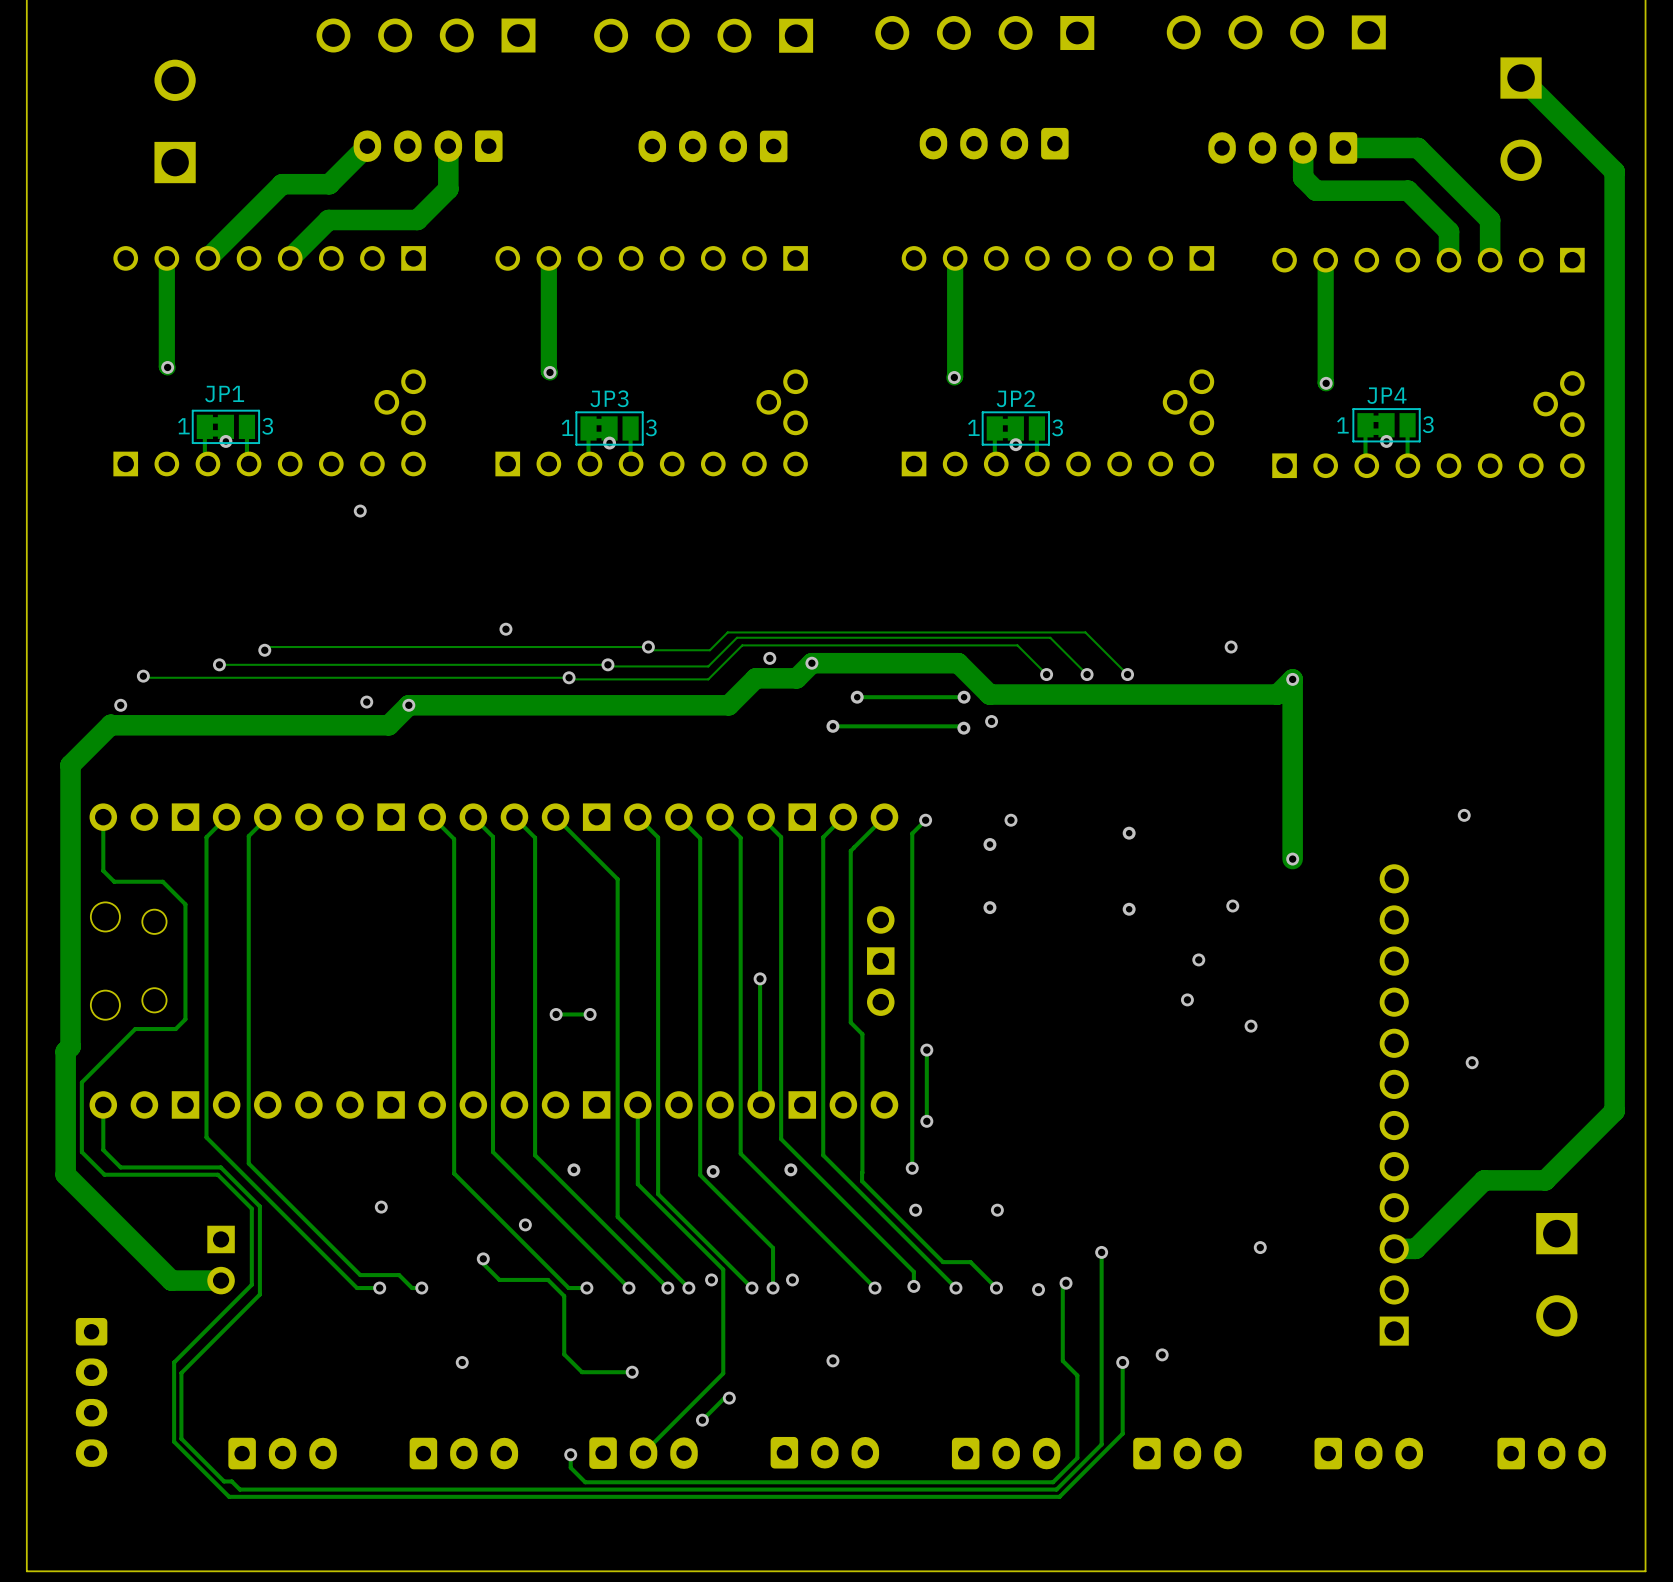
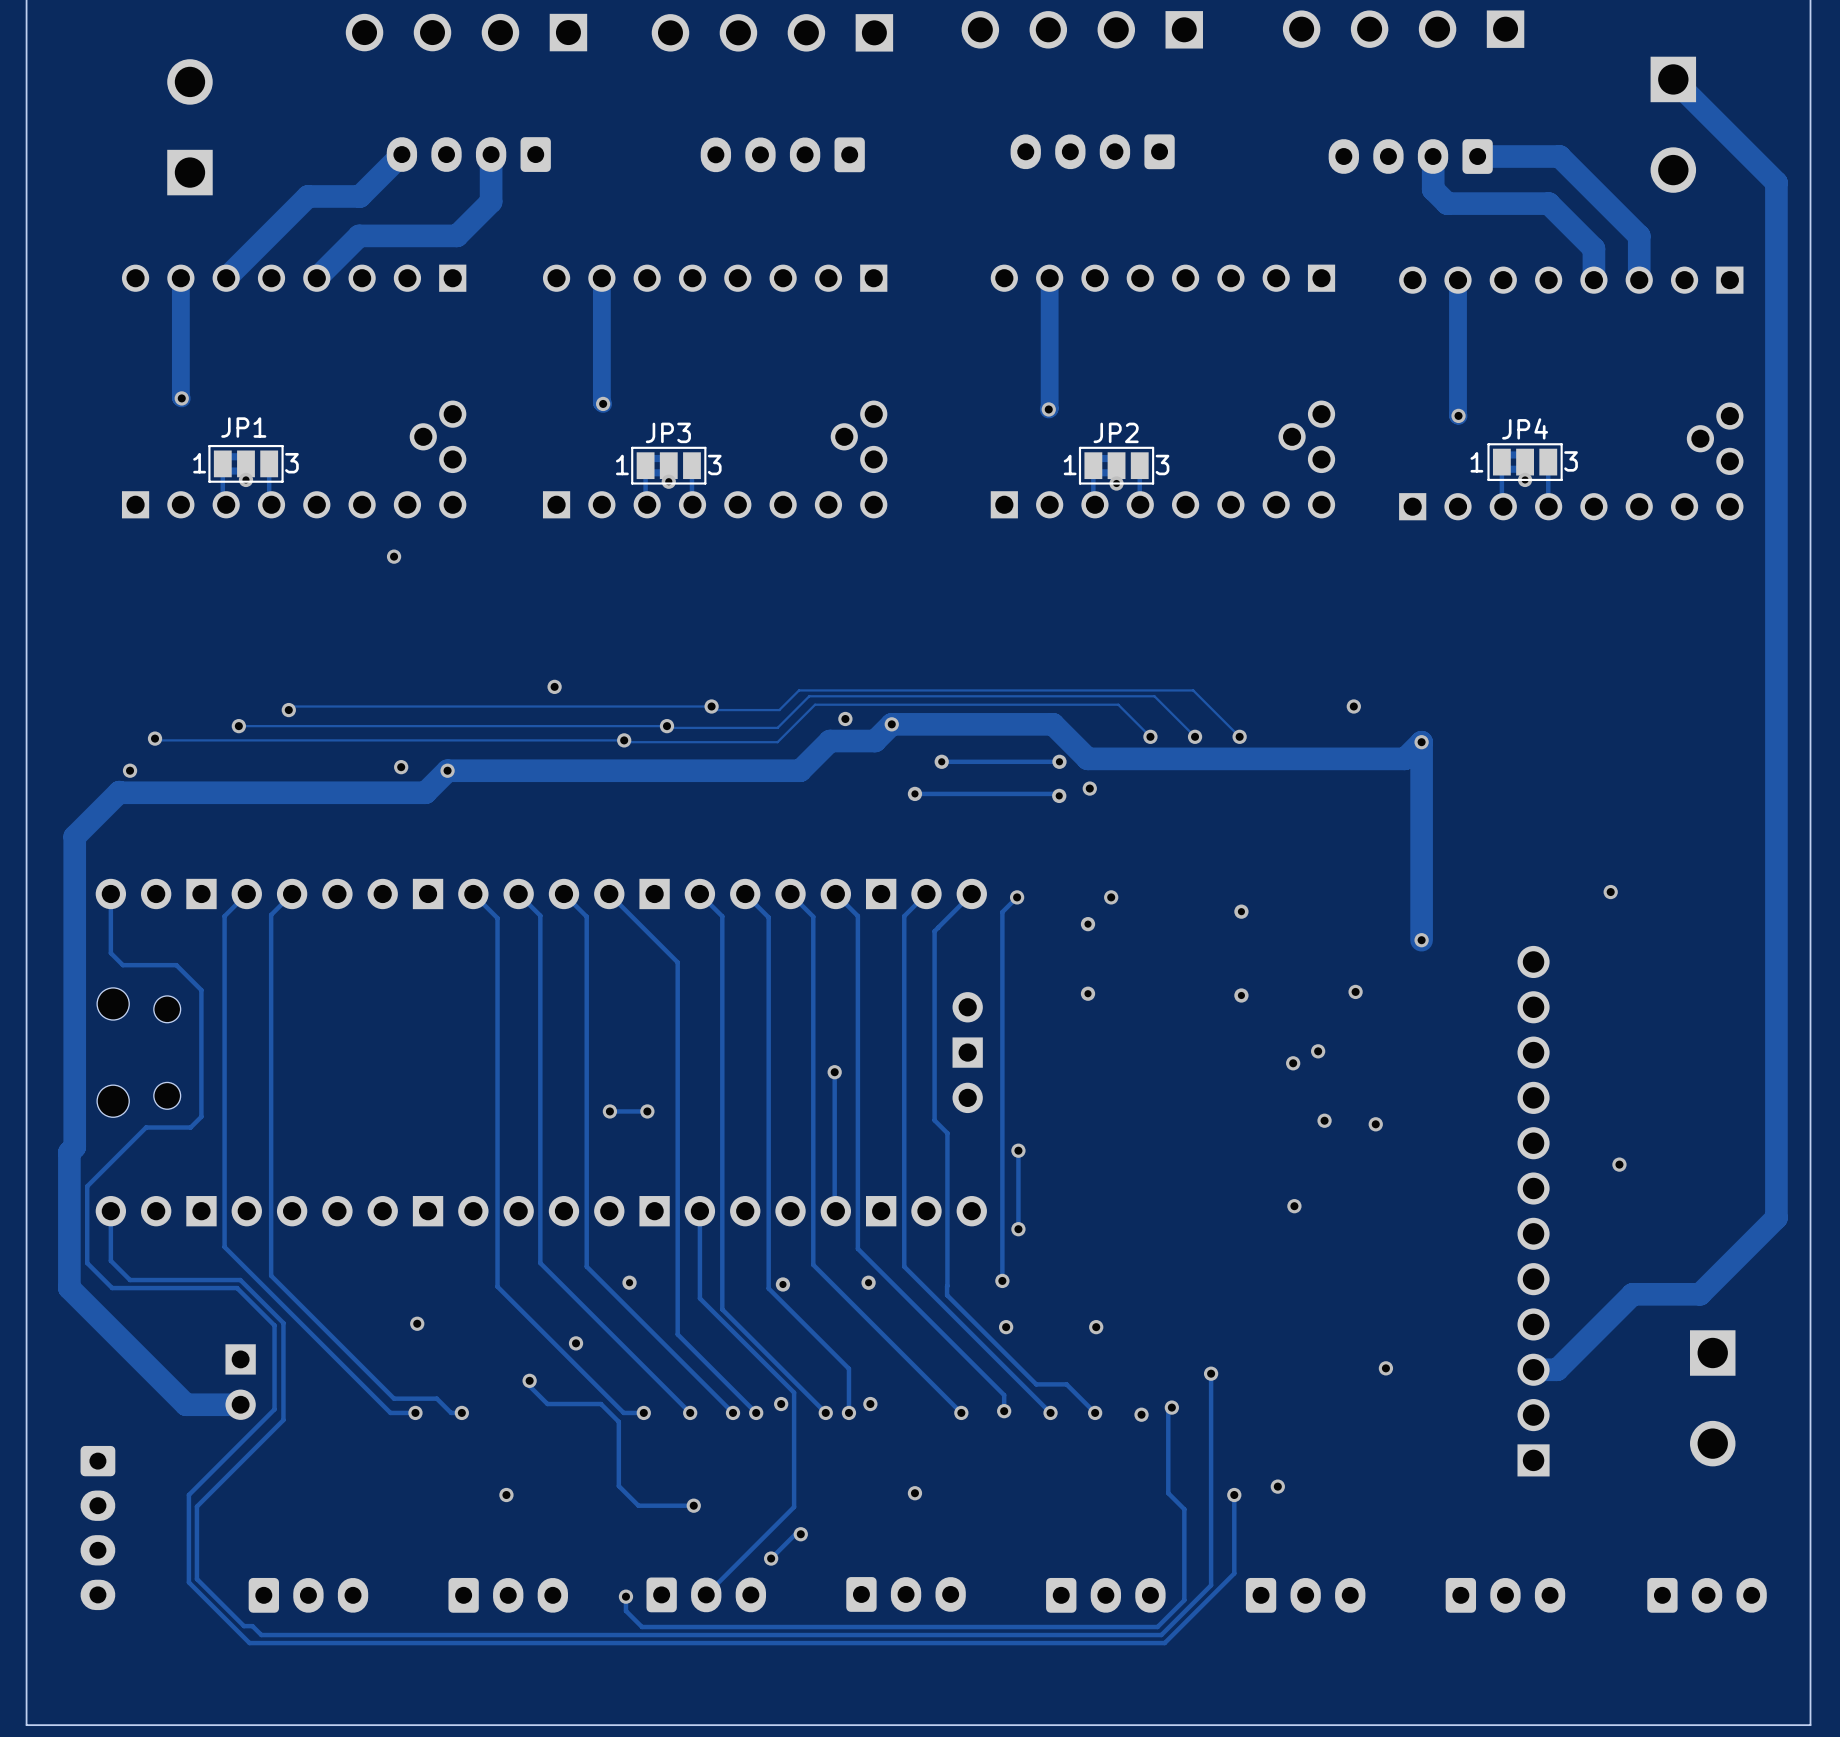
via: none -> (1293, 1063)
via: (1187, 999) -> none
via: none -> (1324, 1120)
via: none -> (1294, 1206)

